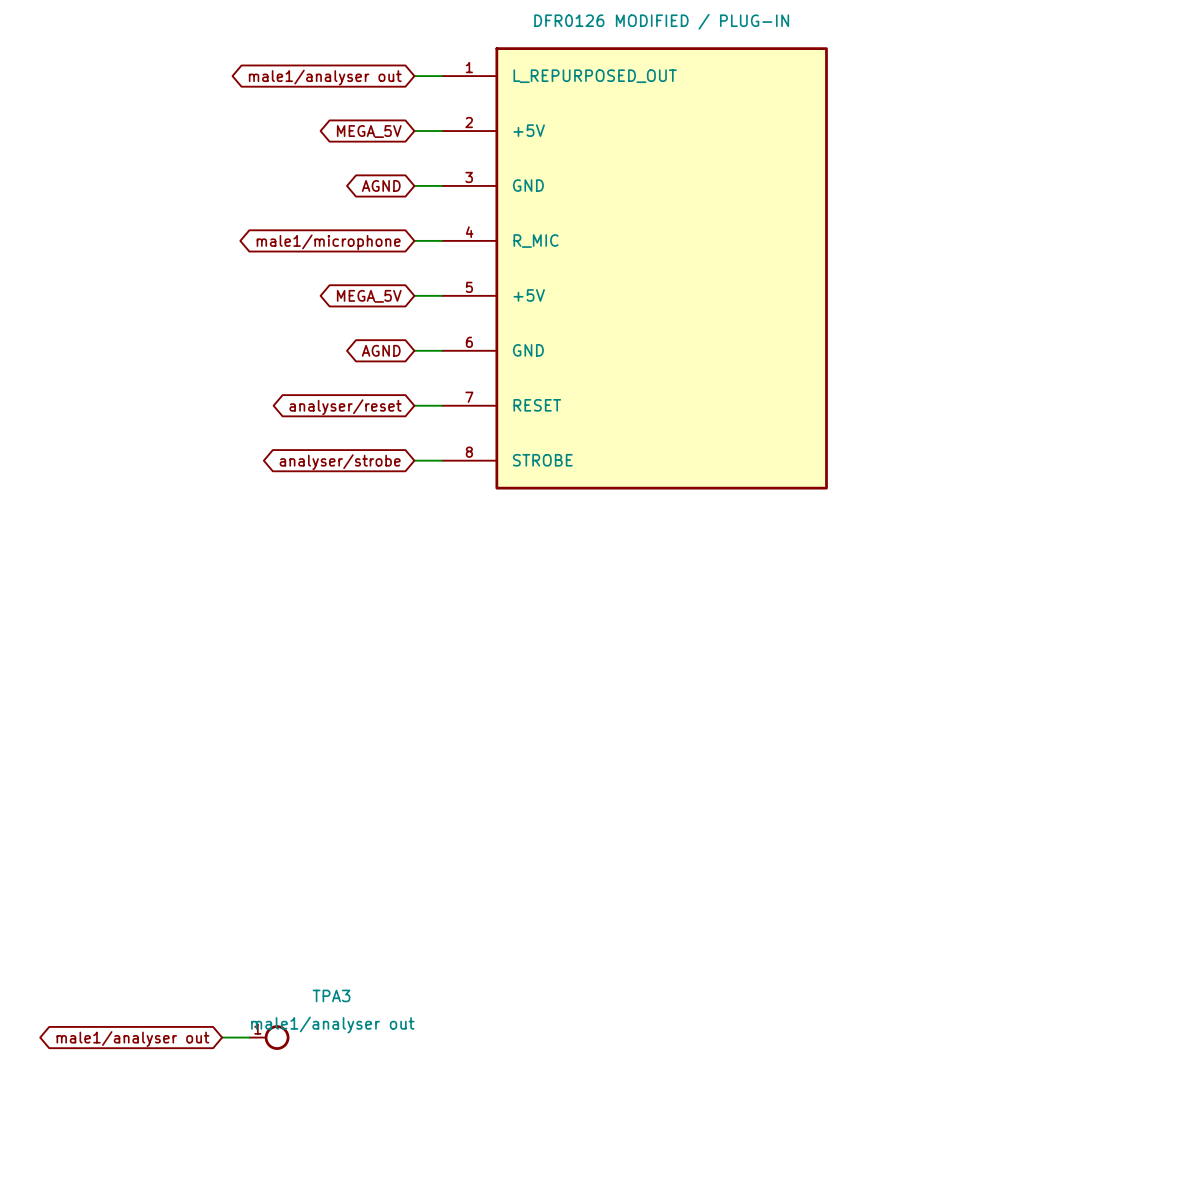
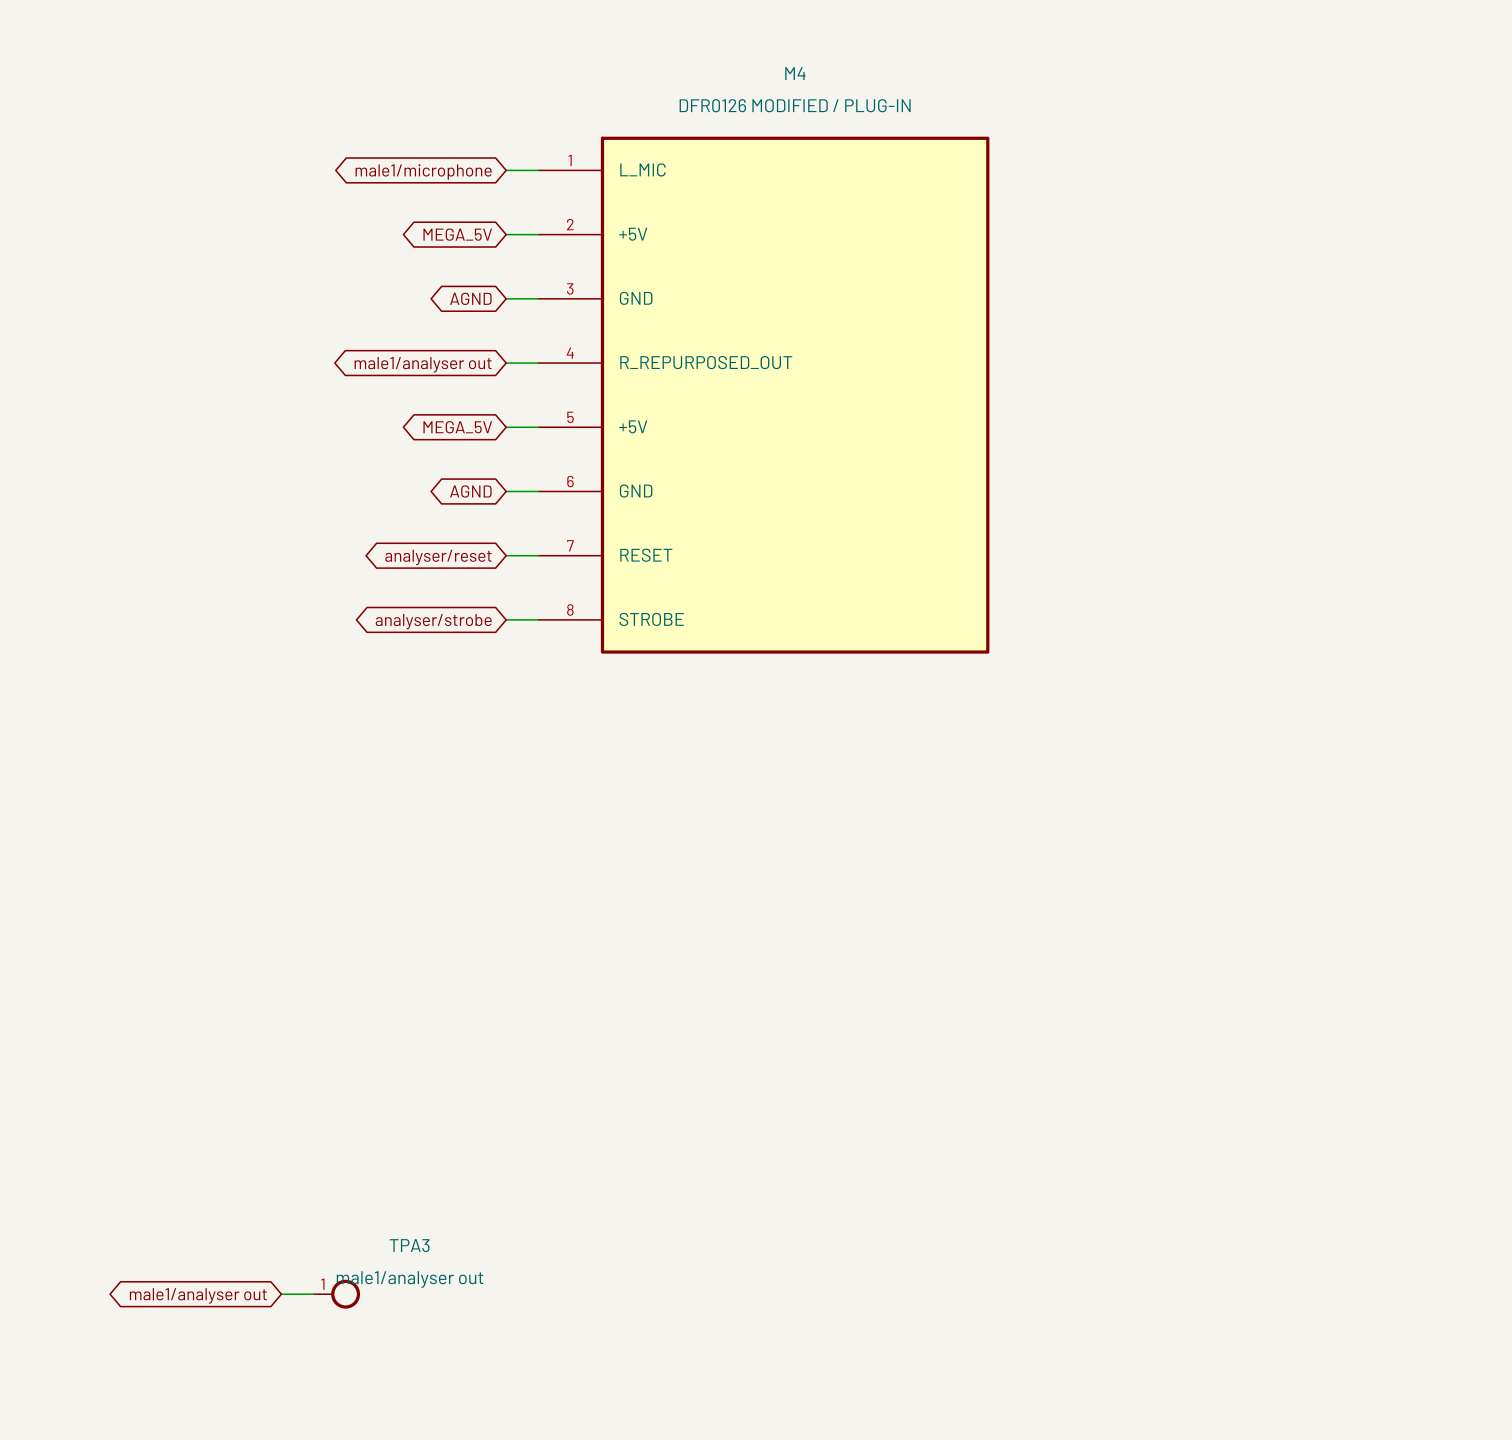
M4 pin name: L_REPURPOSED_OUT (595, 76) -> L_MIC (642, 169)
global label: male1/analyser out (325, 77) -> male1/microphone (423, 171)
M4 pin name: R_MIC (536, 241) -> R_REPURPOSED_OUT (706, 362)
global label: male1/microphone (328, 242) -> male1/analyser out (423, 364)

